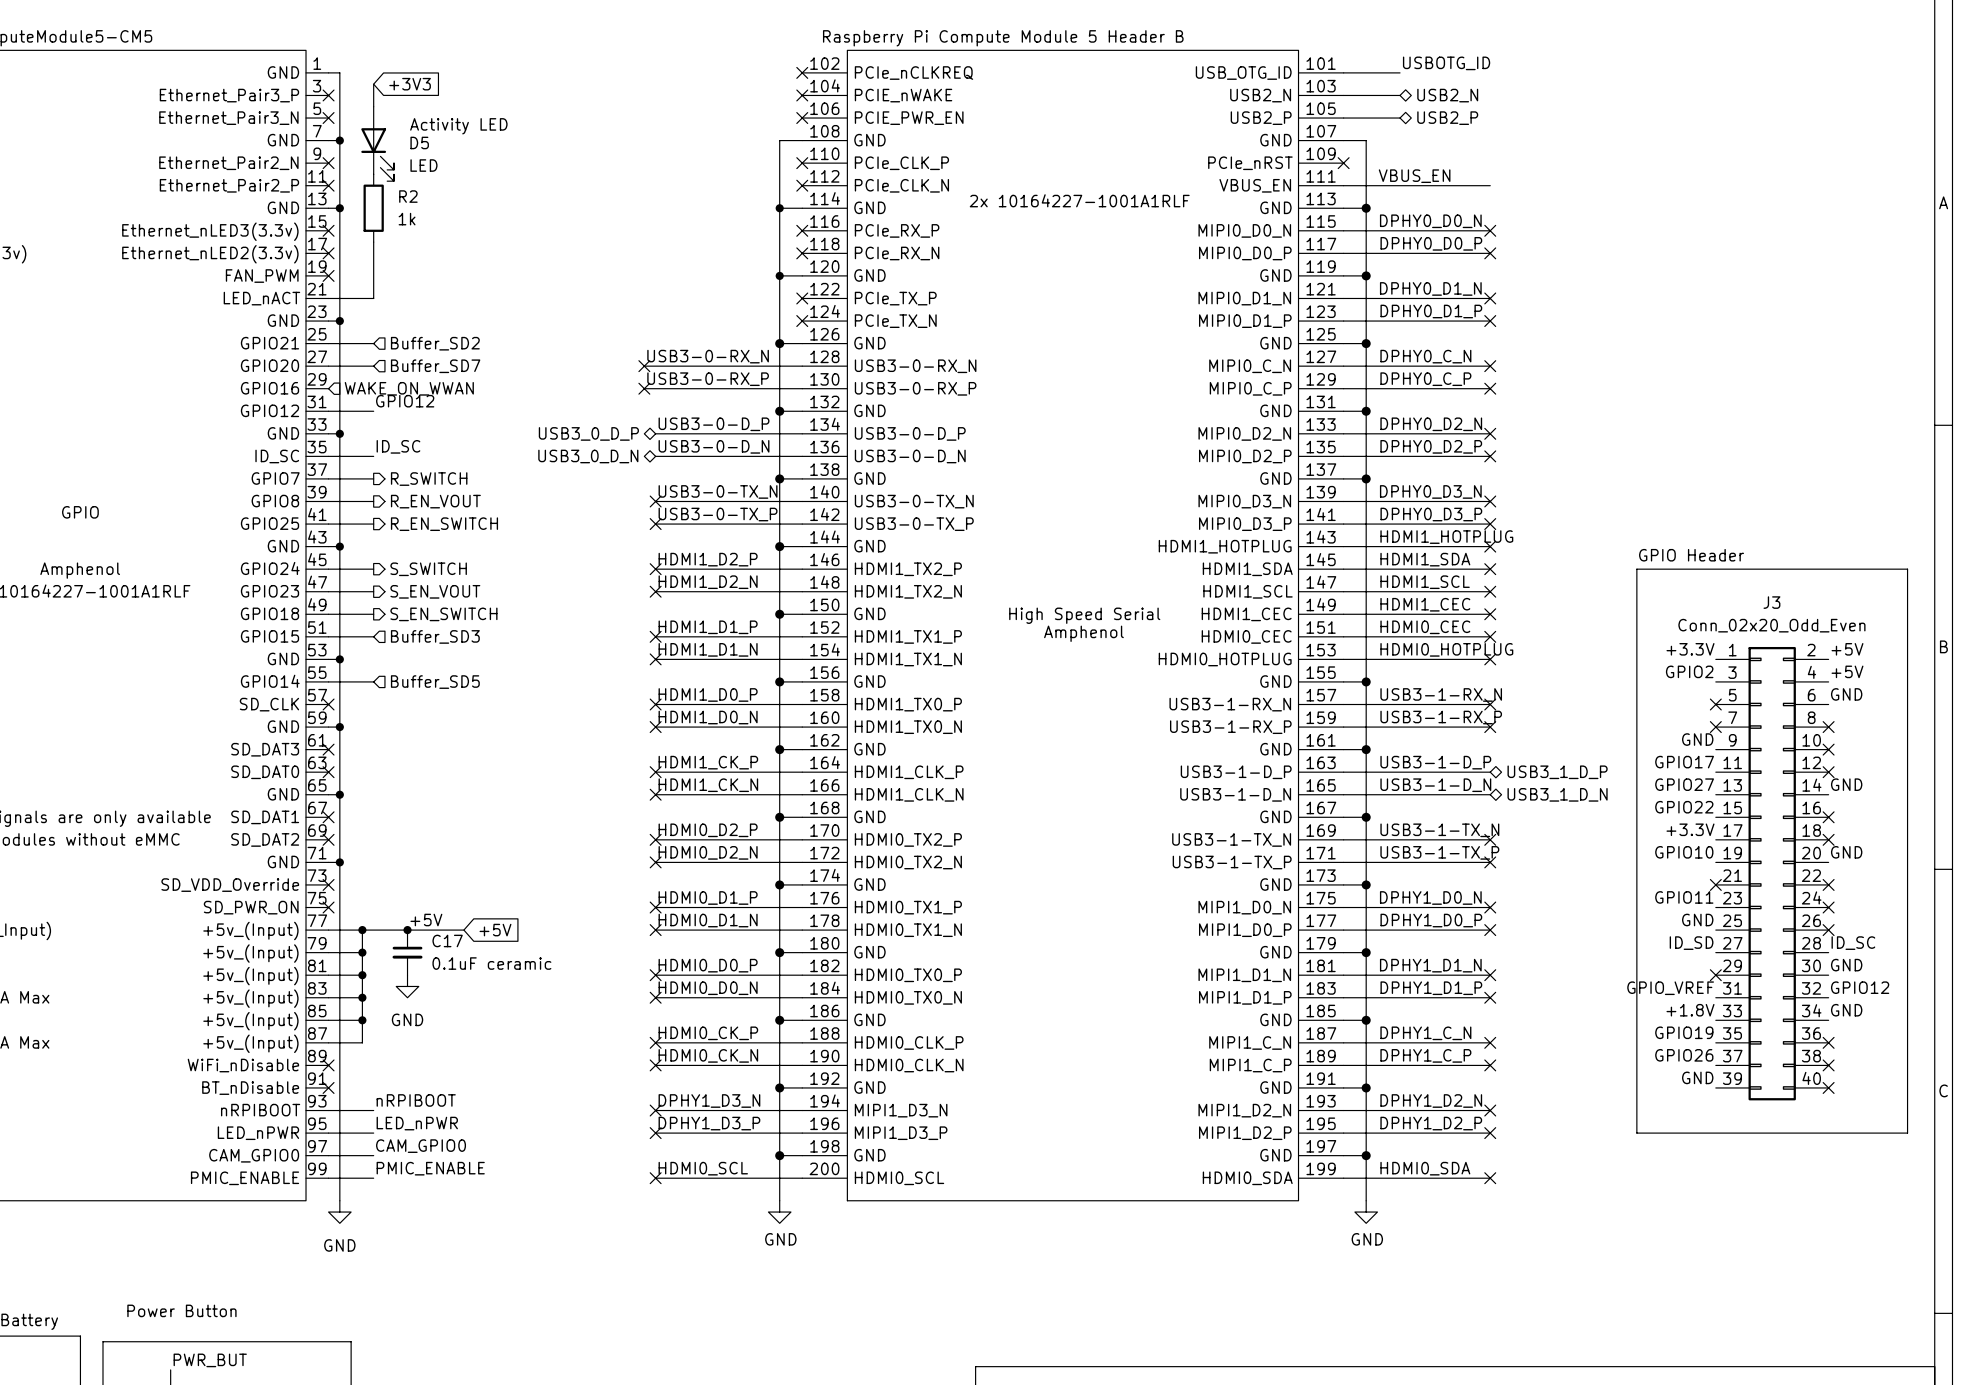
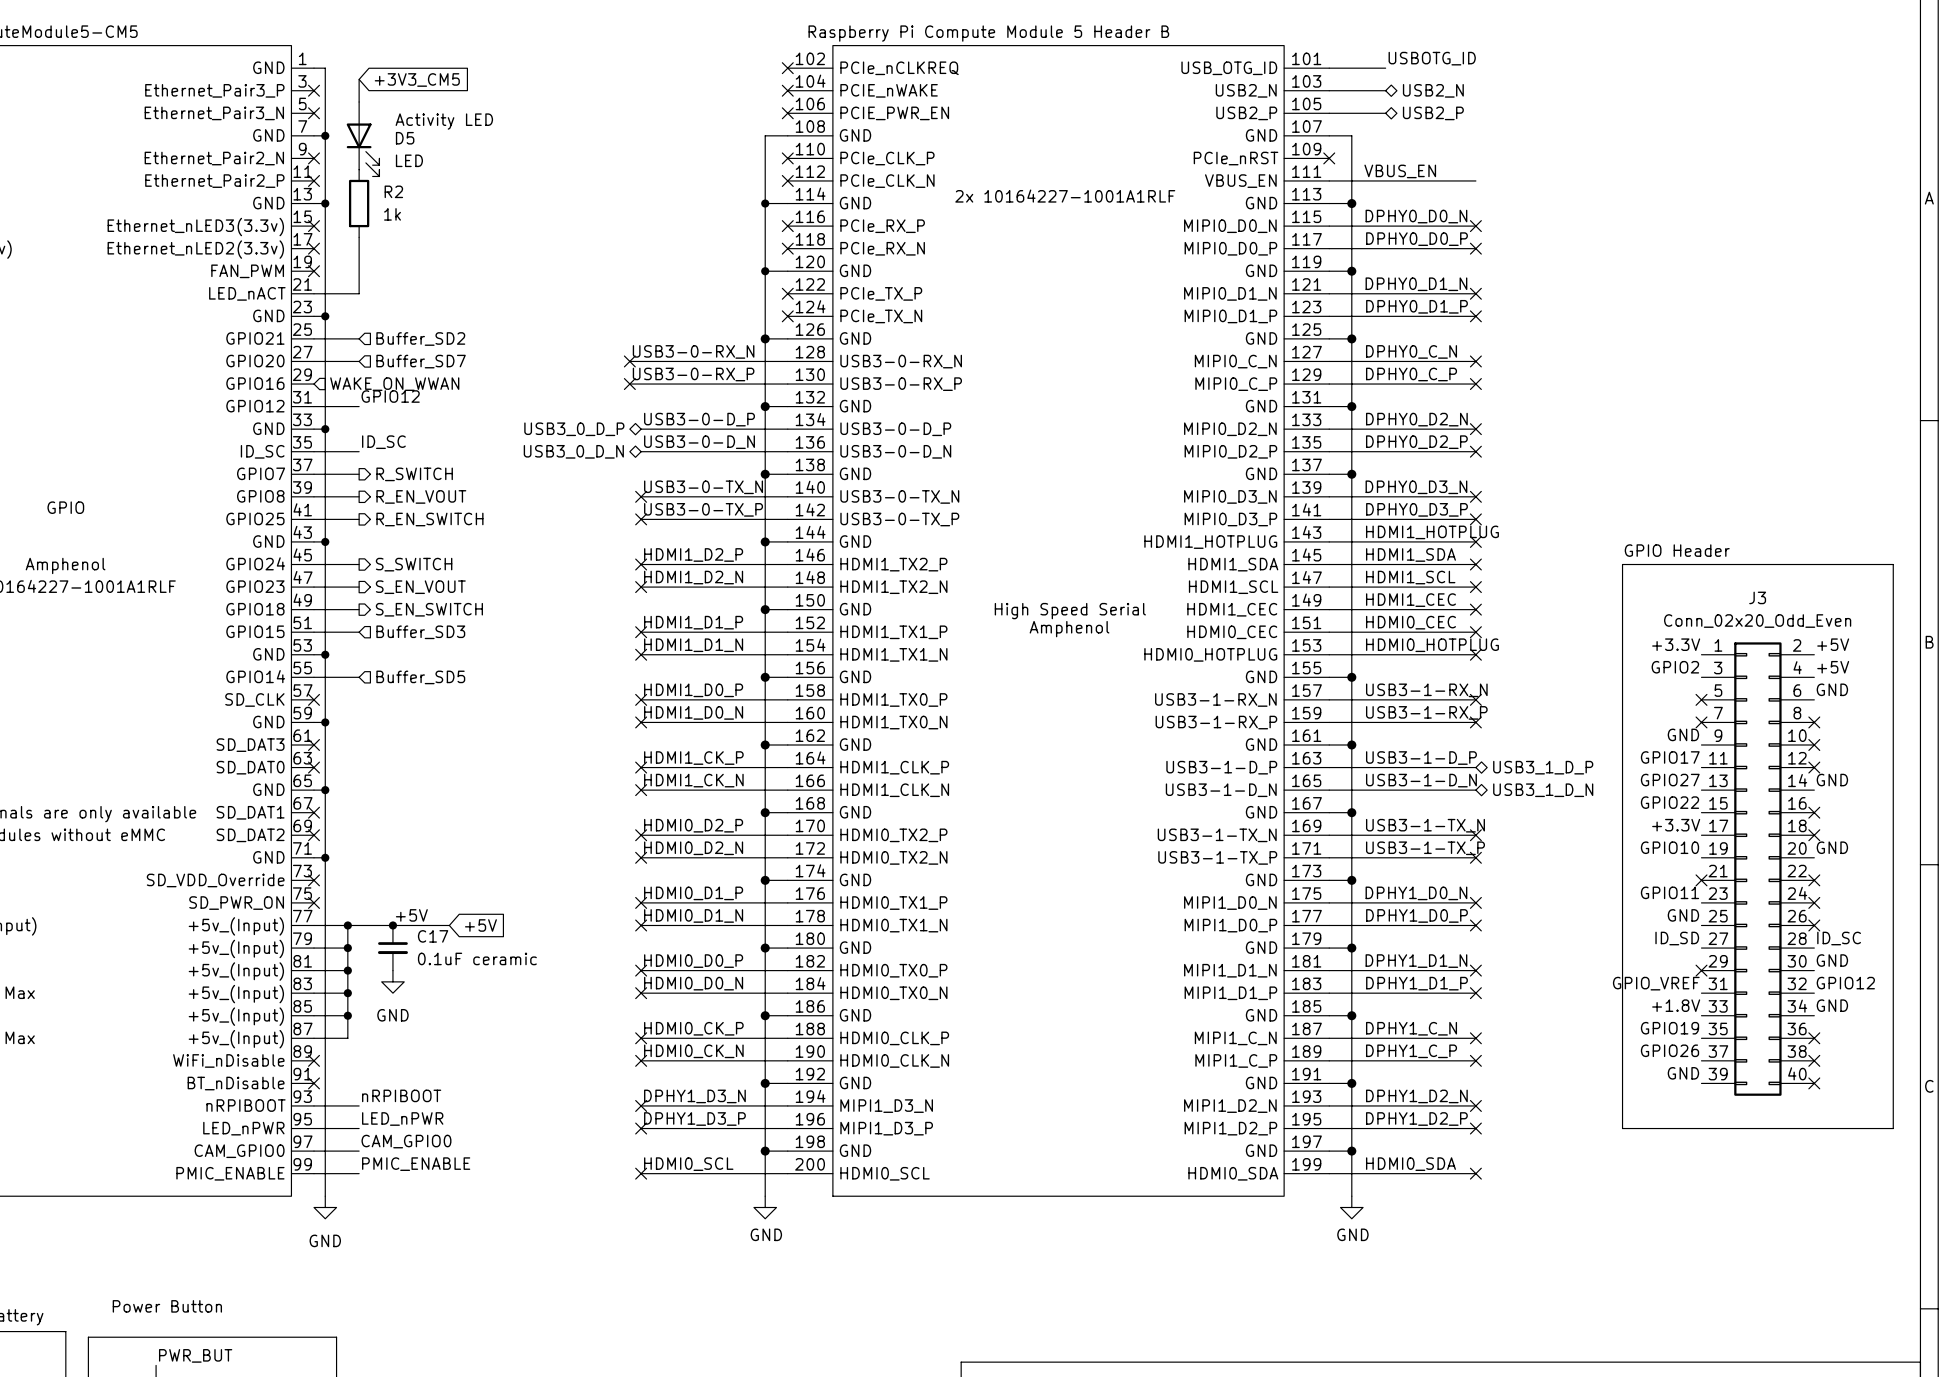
global label: +3V3 (410, 84) -> +3V3_CM5 (417, 79)

